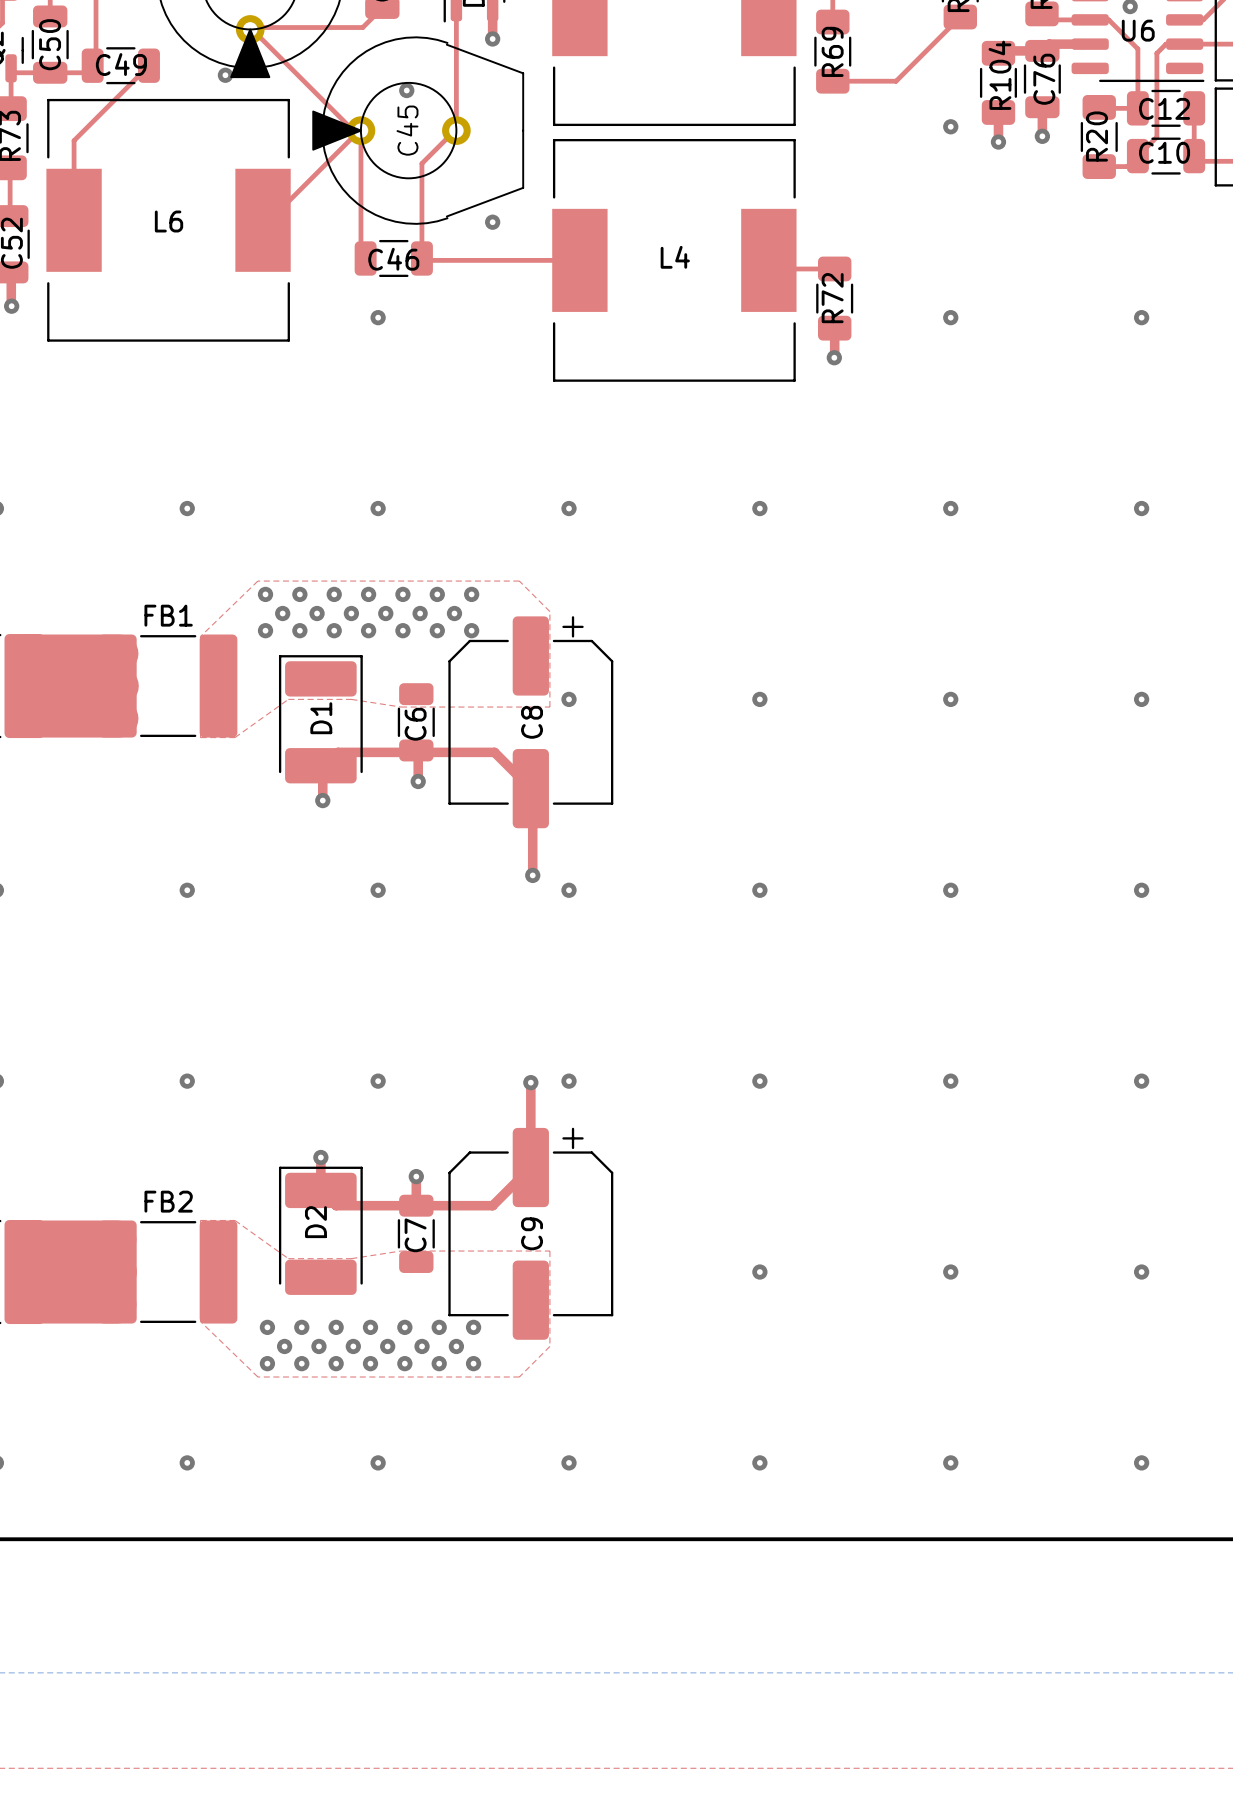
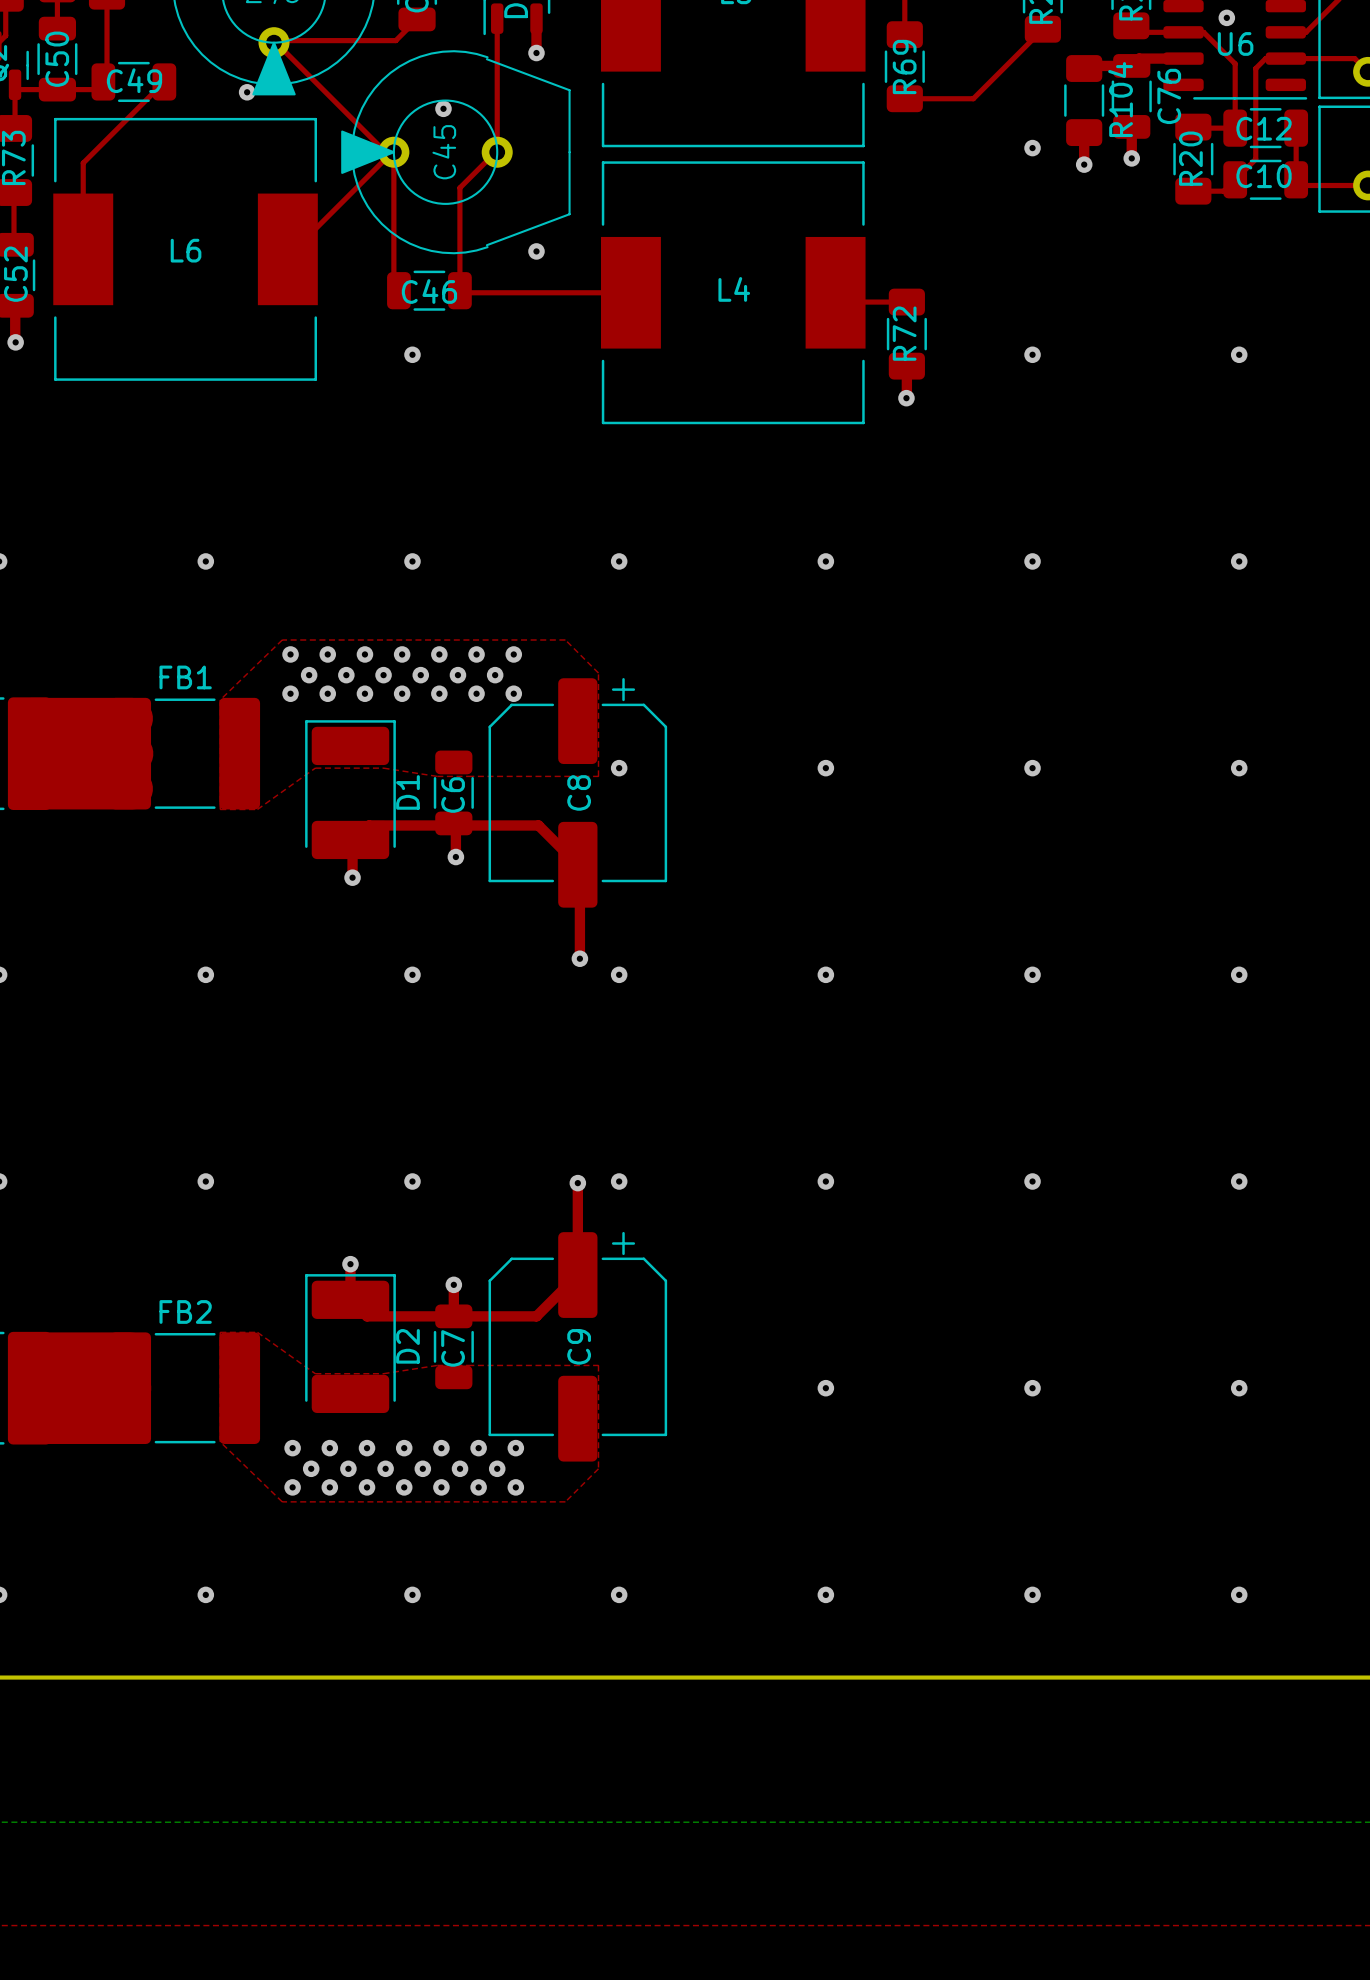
R104 name position: R104 (999, 75) -> R104 (1120, 99)
C76 name position: C76 (1044, 79) -> C76 (1169, 96)
D1 name position: D1 (321, 718) -> D1 (407, 792)
D2 name position: D2 (315, 1222) -> D2 (407, 1346)

